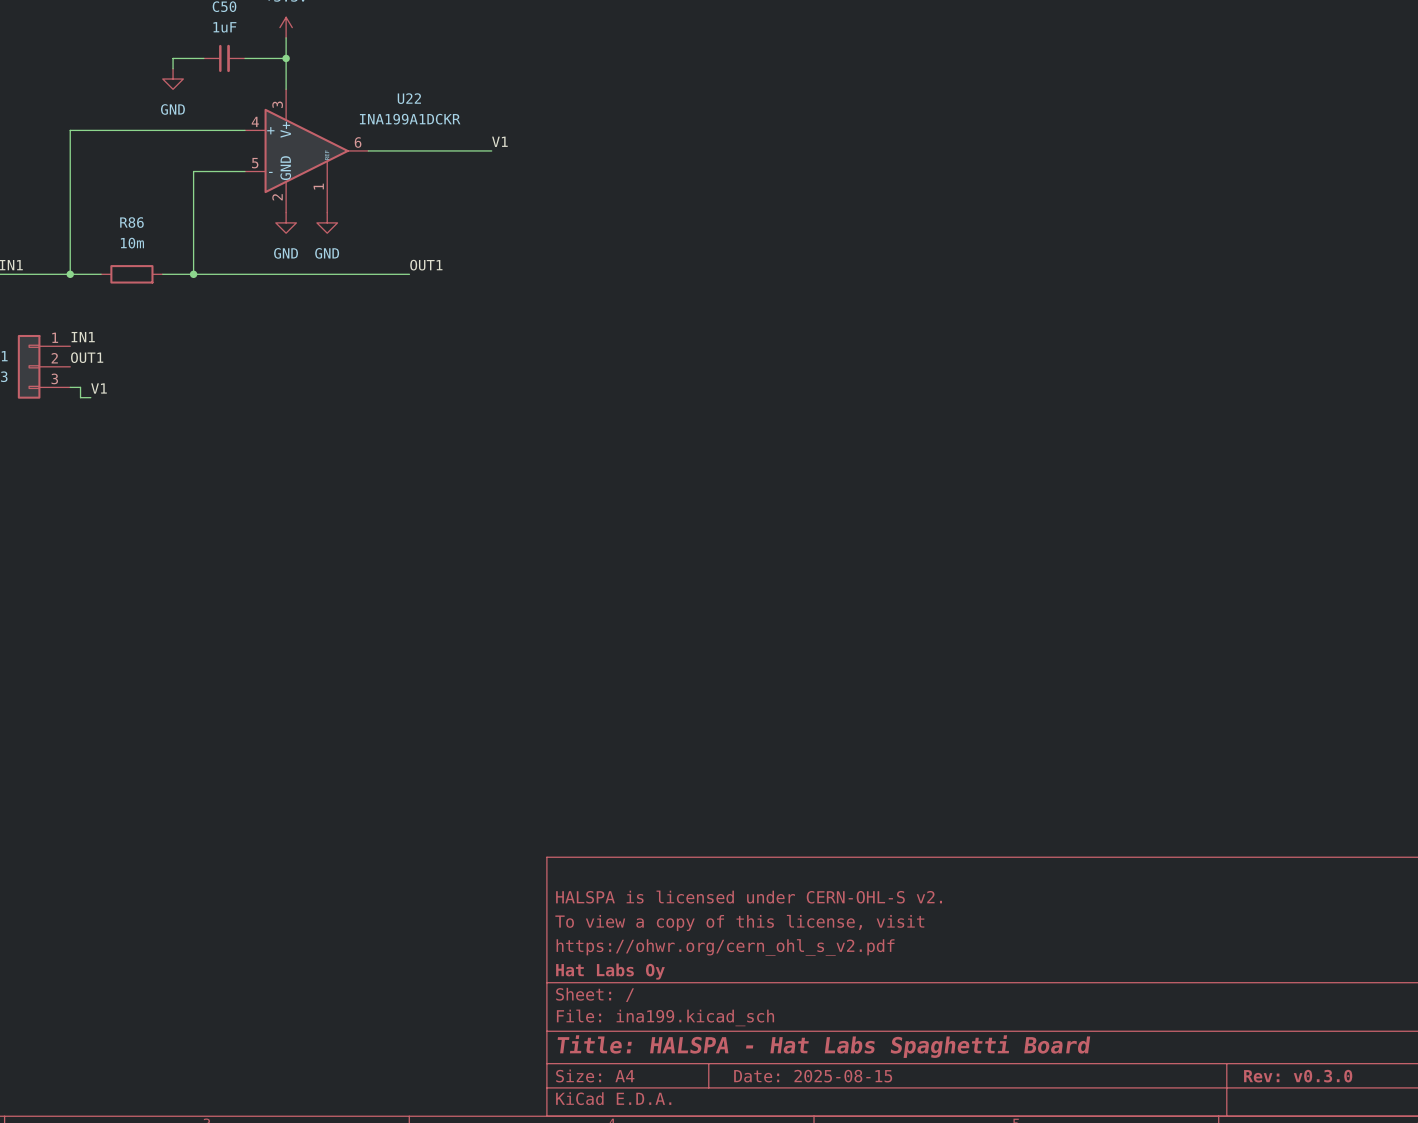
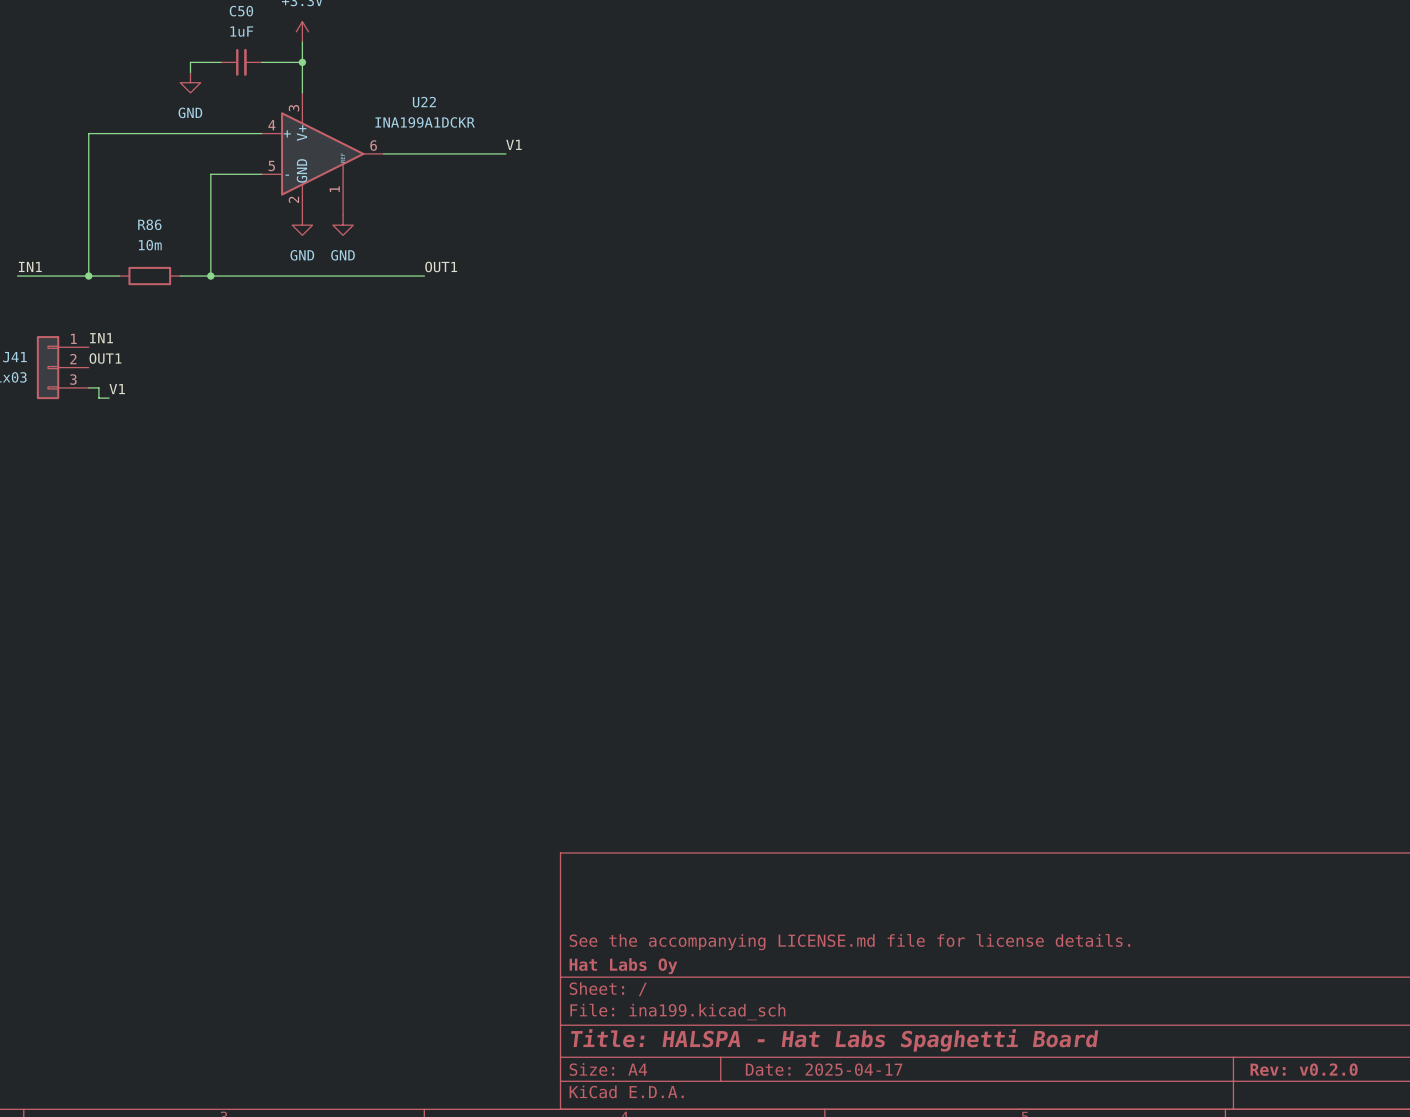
title block: HALSPA is licensed under CERN-OHL-S v2. (749, 897) -> none
title block: To view a copy of this license, visit (739, 922) -> none
title block: https://ohwr.org/cern_ohl_s_v2.pdf (725, 947) -> See the accompanying LICENSE.md file for license details. (849, 942)
title block: Date: 2025-08-15 (813, 1076) -> Date: 2025-04-17 (824, 1069)
title block: Rev: v0.3.0 (1298, 1076) -> Rev: v0.2.0 (1304, 1069)

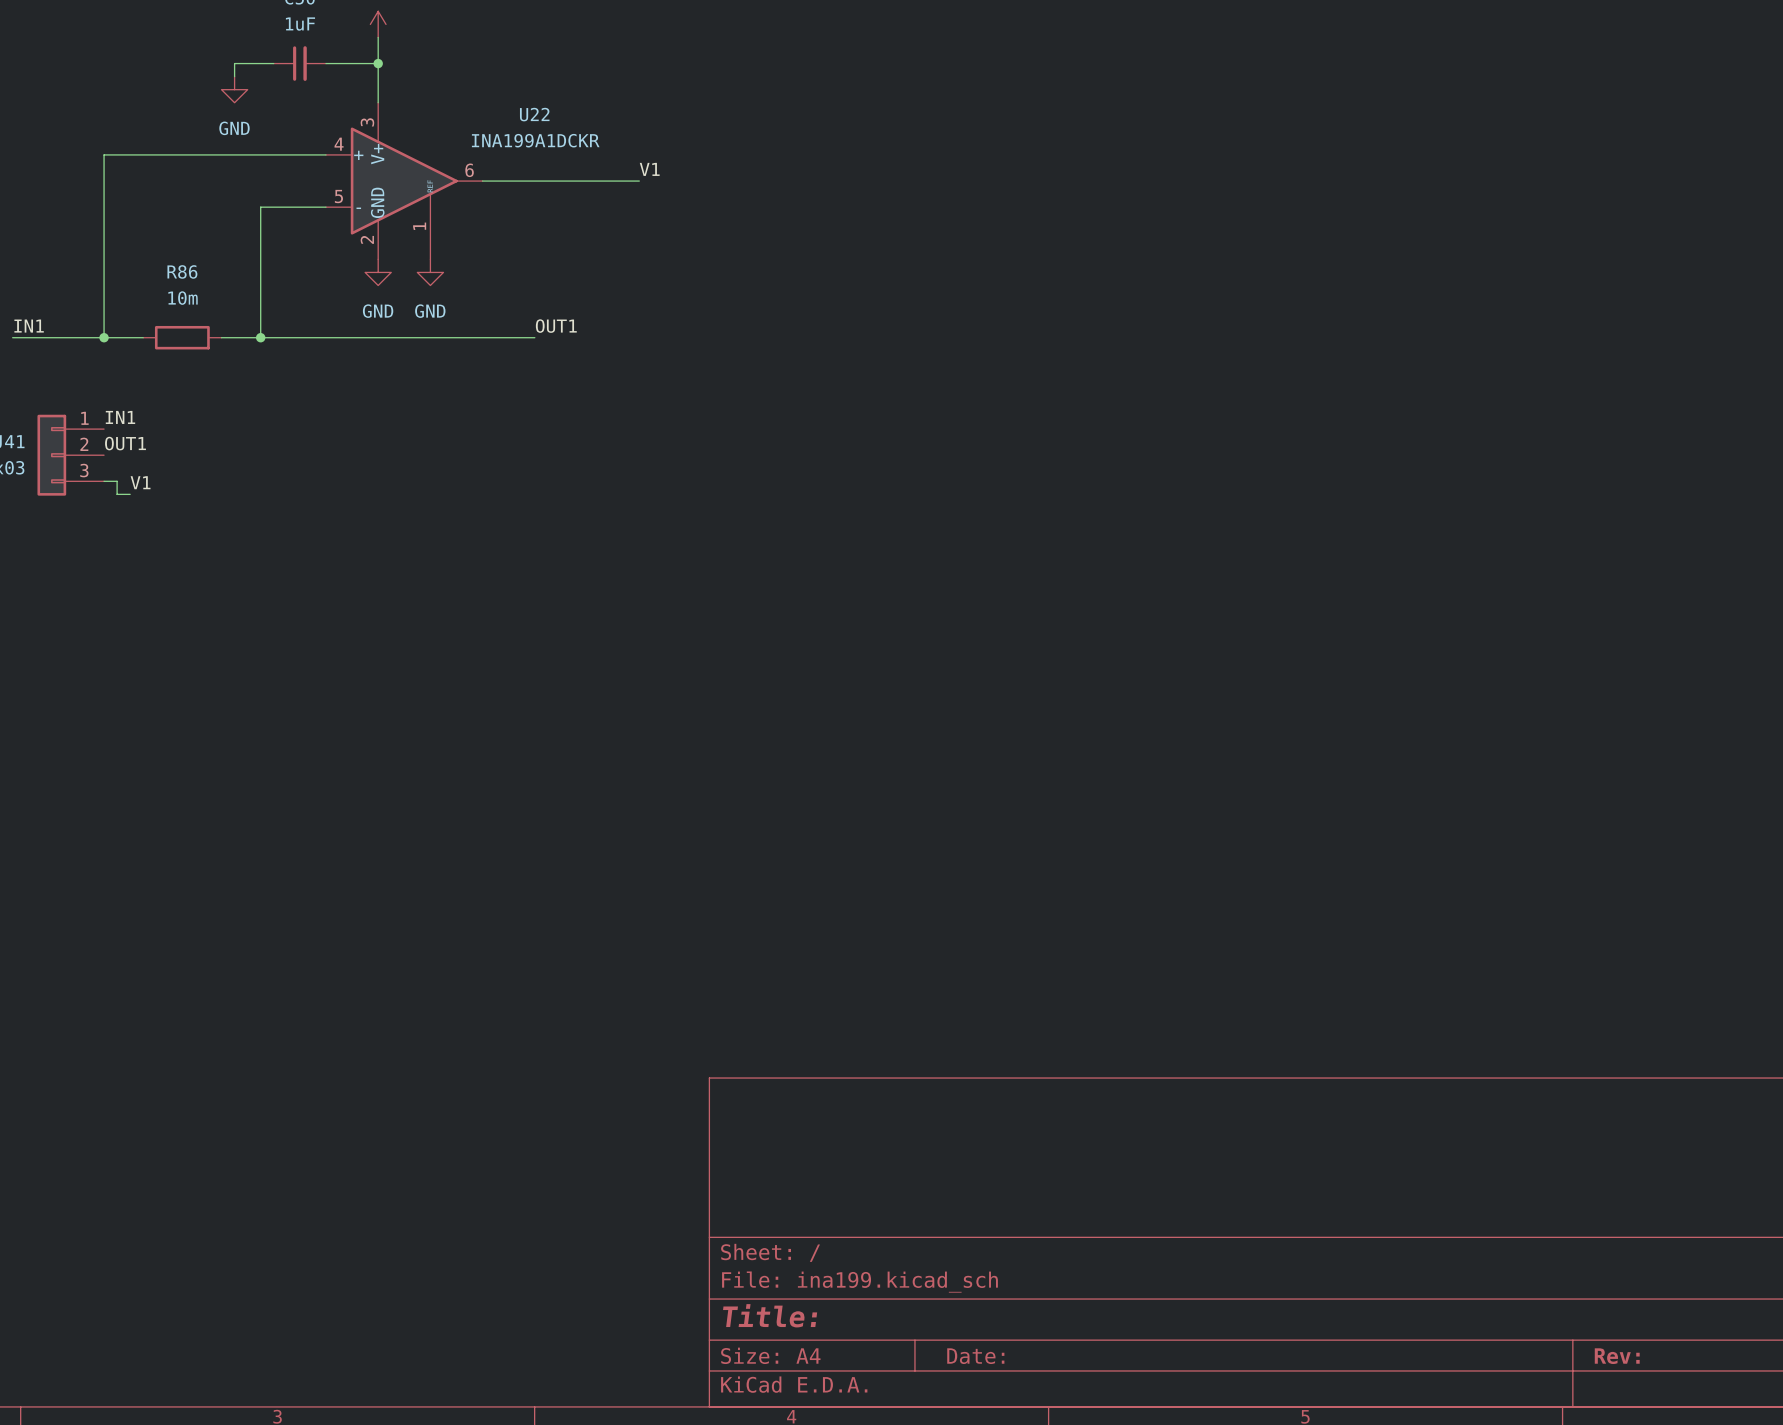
title block: See the accompanying LICENSE.md file for license details. (849, 942) -> none
title block: Hat Labs Oy (623, 966) -> none
title block: Title: HALSPA - Hat Labs Spaghetti Board (834, 1040) -> Title: (770, 1315)
title block: Date: 2025-04-17 (824, 1069) -> Date: (975, 1356)
title block: Rev: v0.2.0 (1304, 1069) -> Rev: (1617, 1356)

